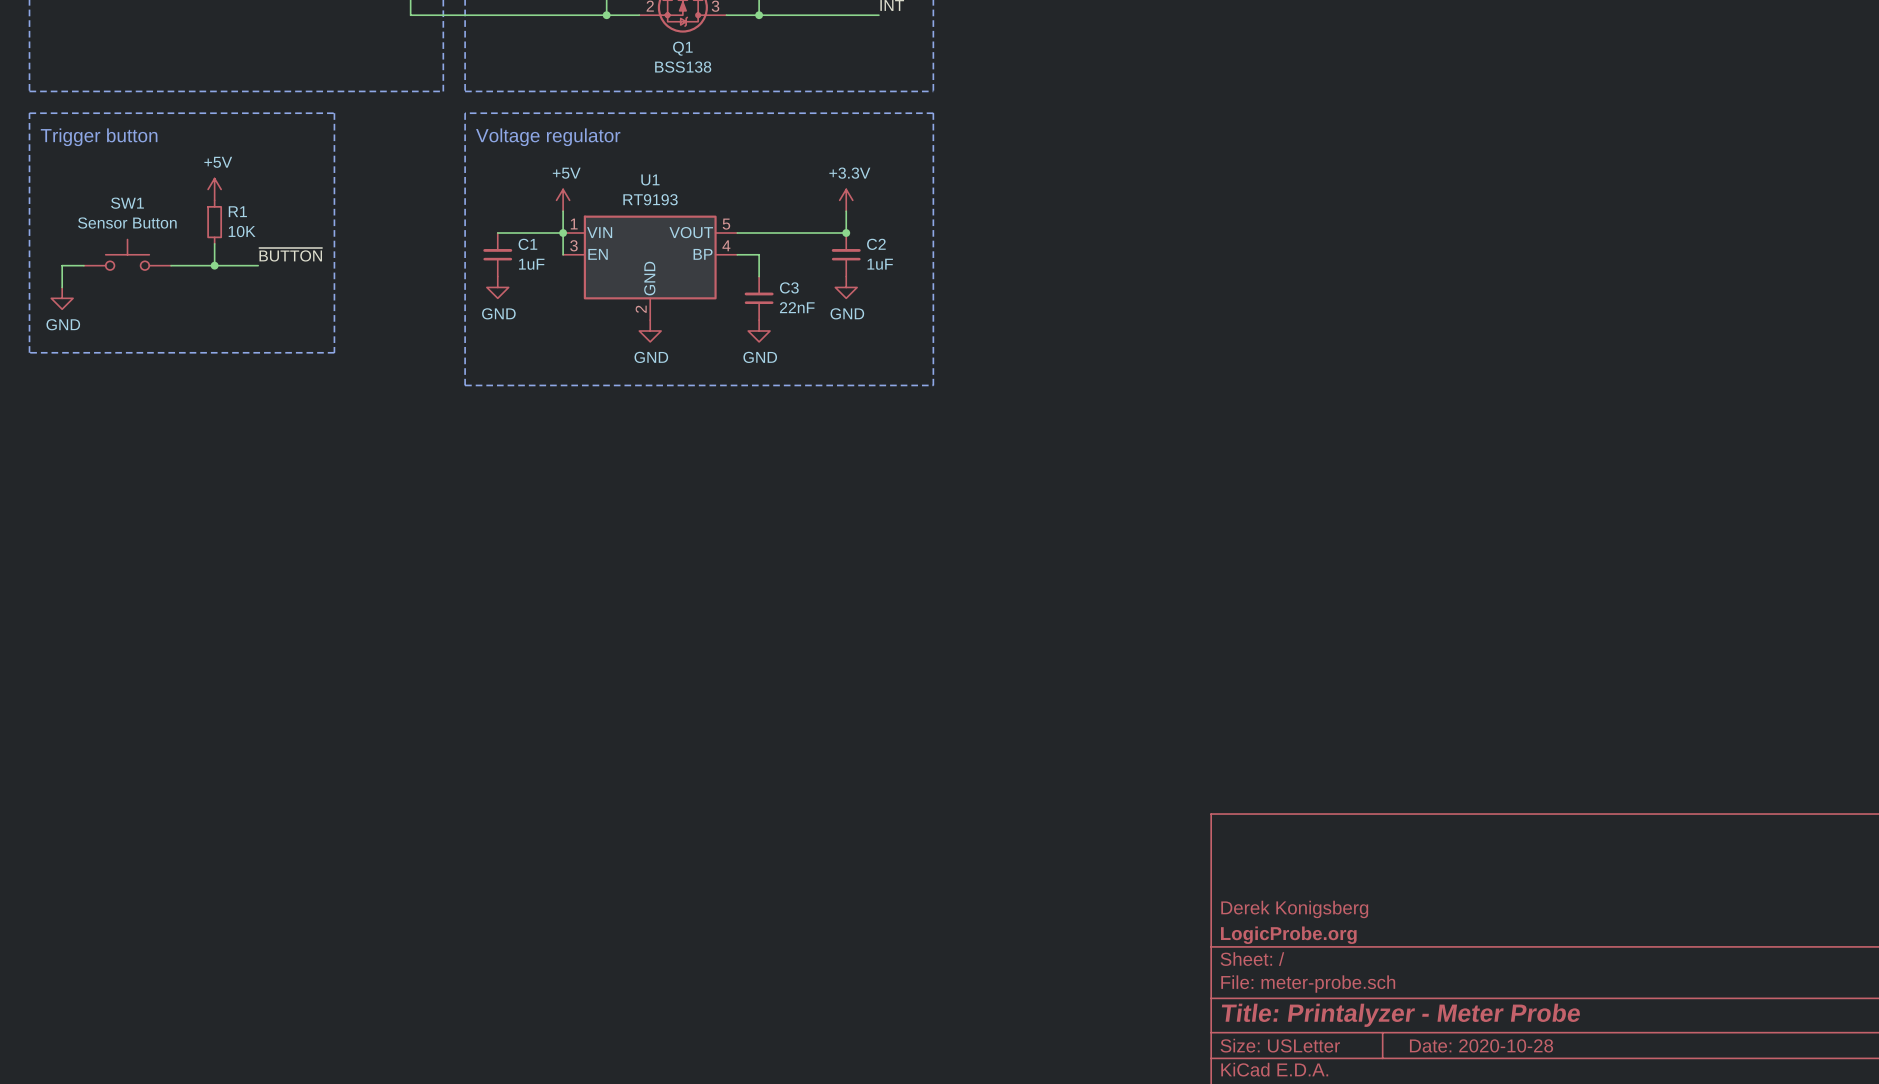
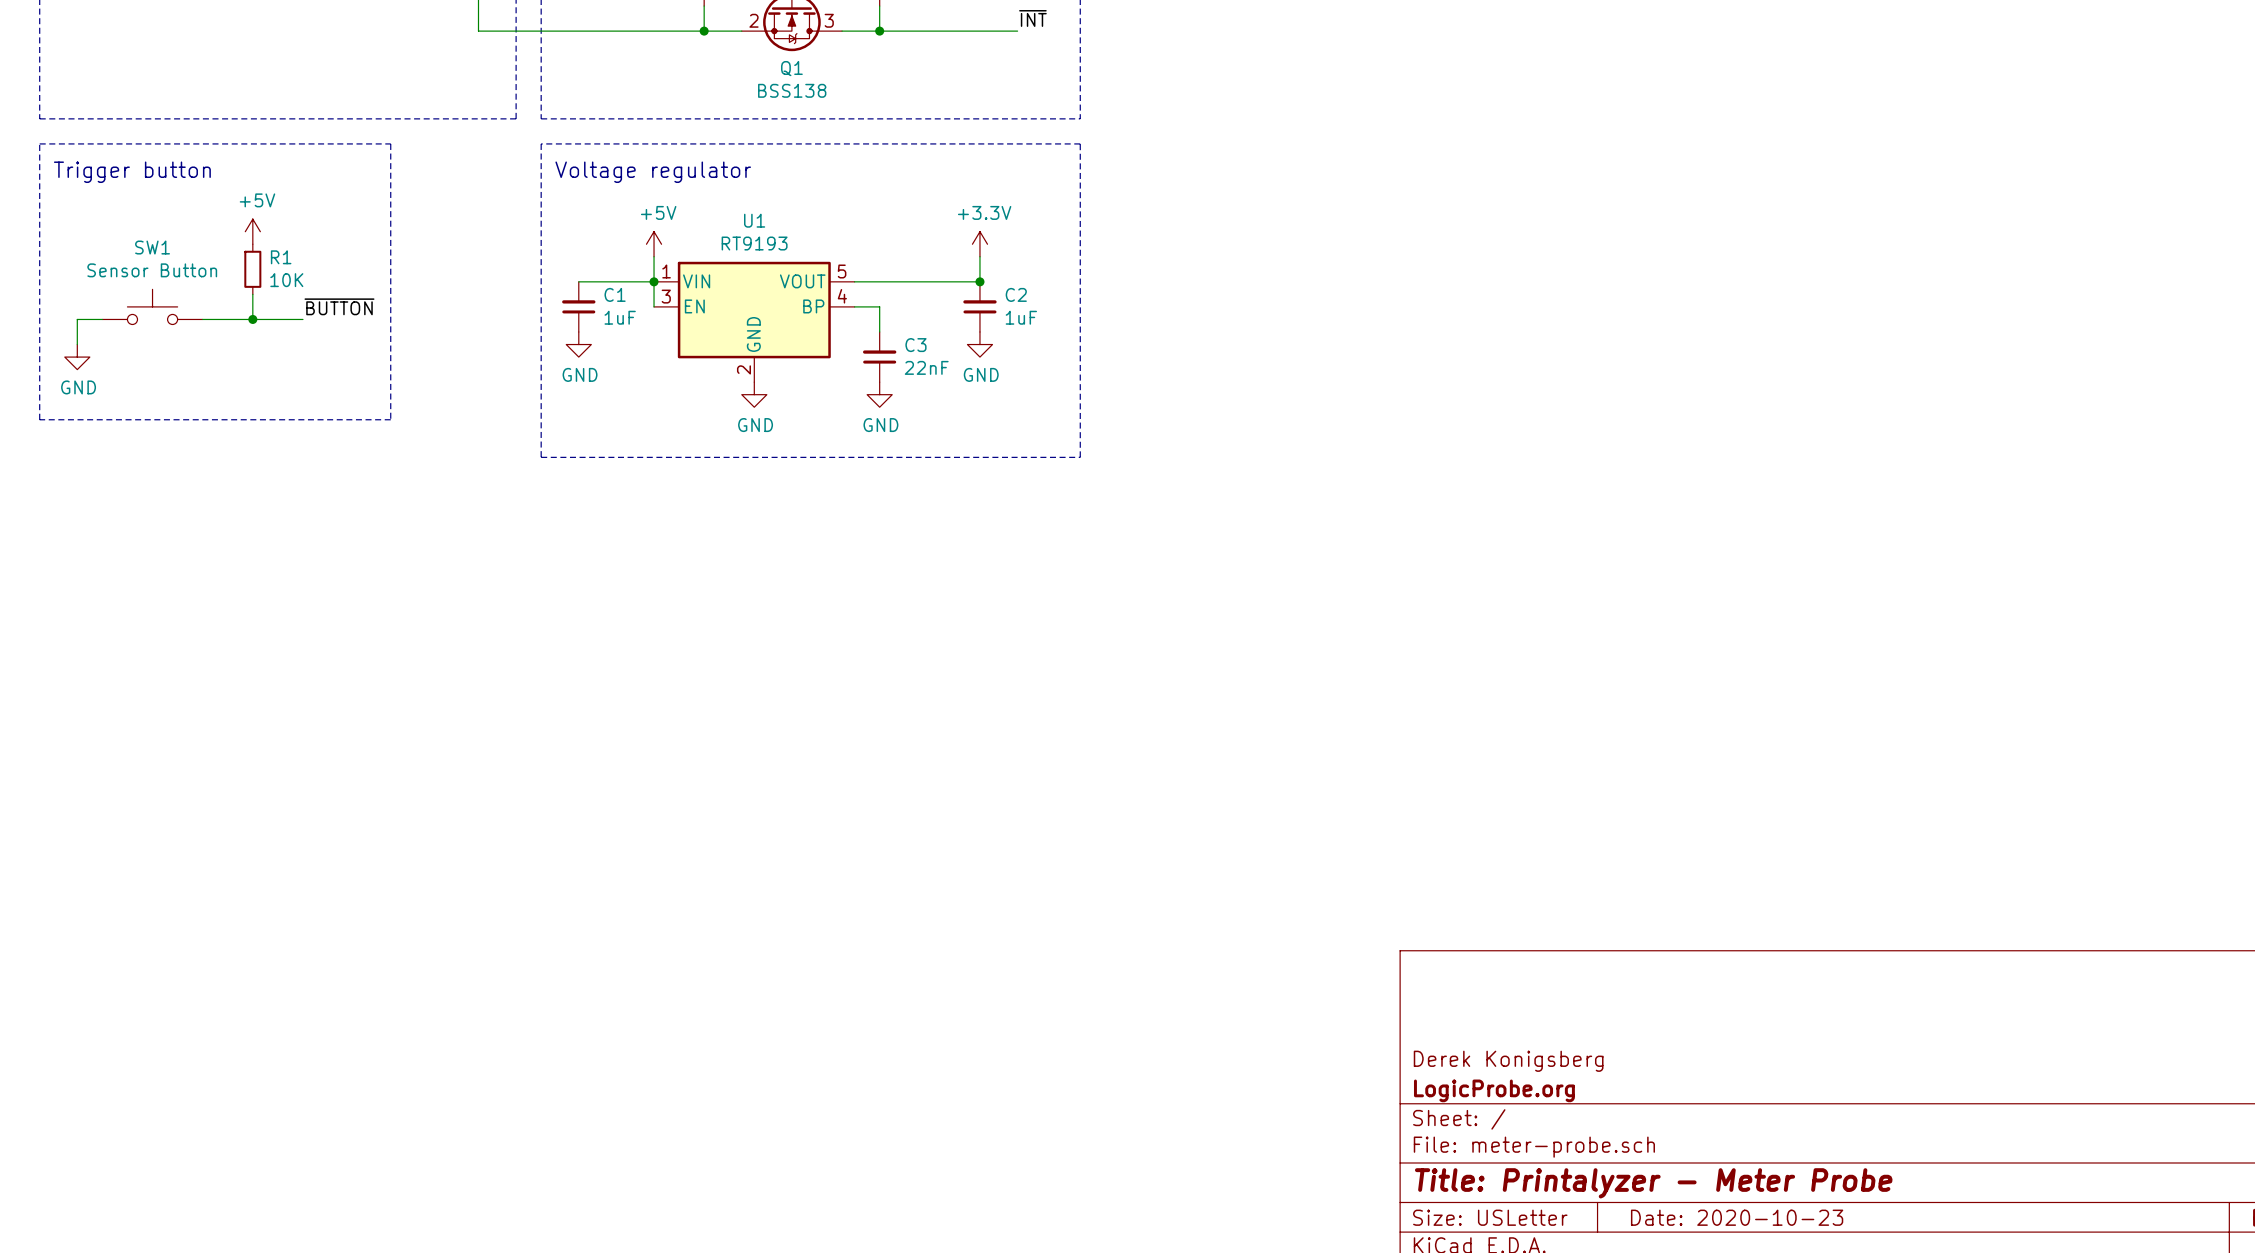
title block: Date: 2020-10-28 (1481, 1045) -> Date: 2020-10-23 (1737, 1217)

